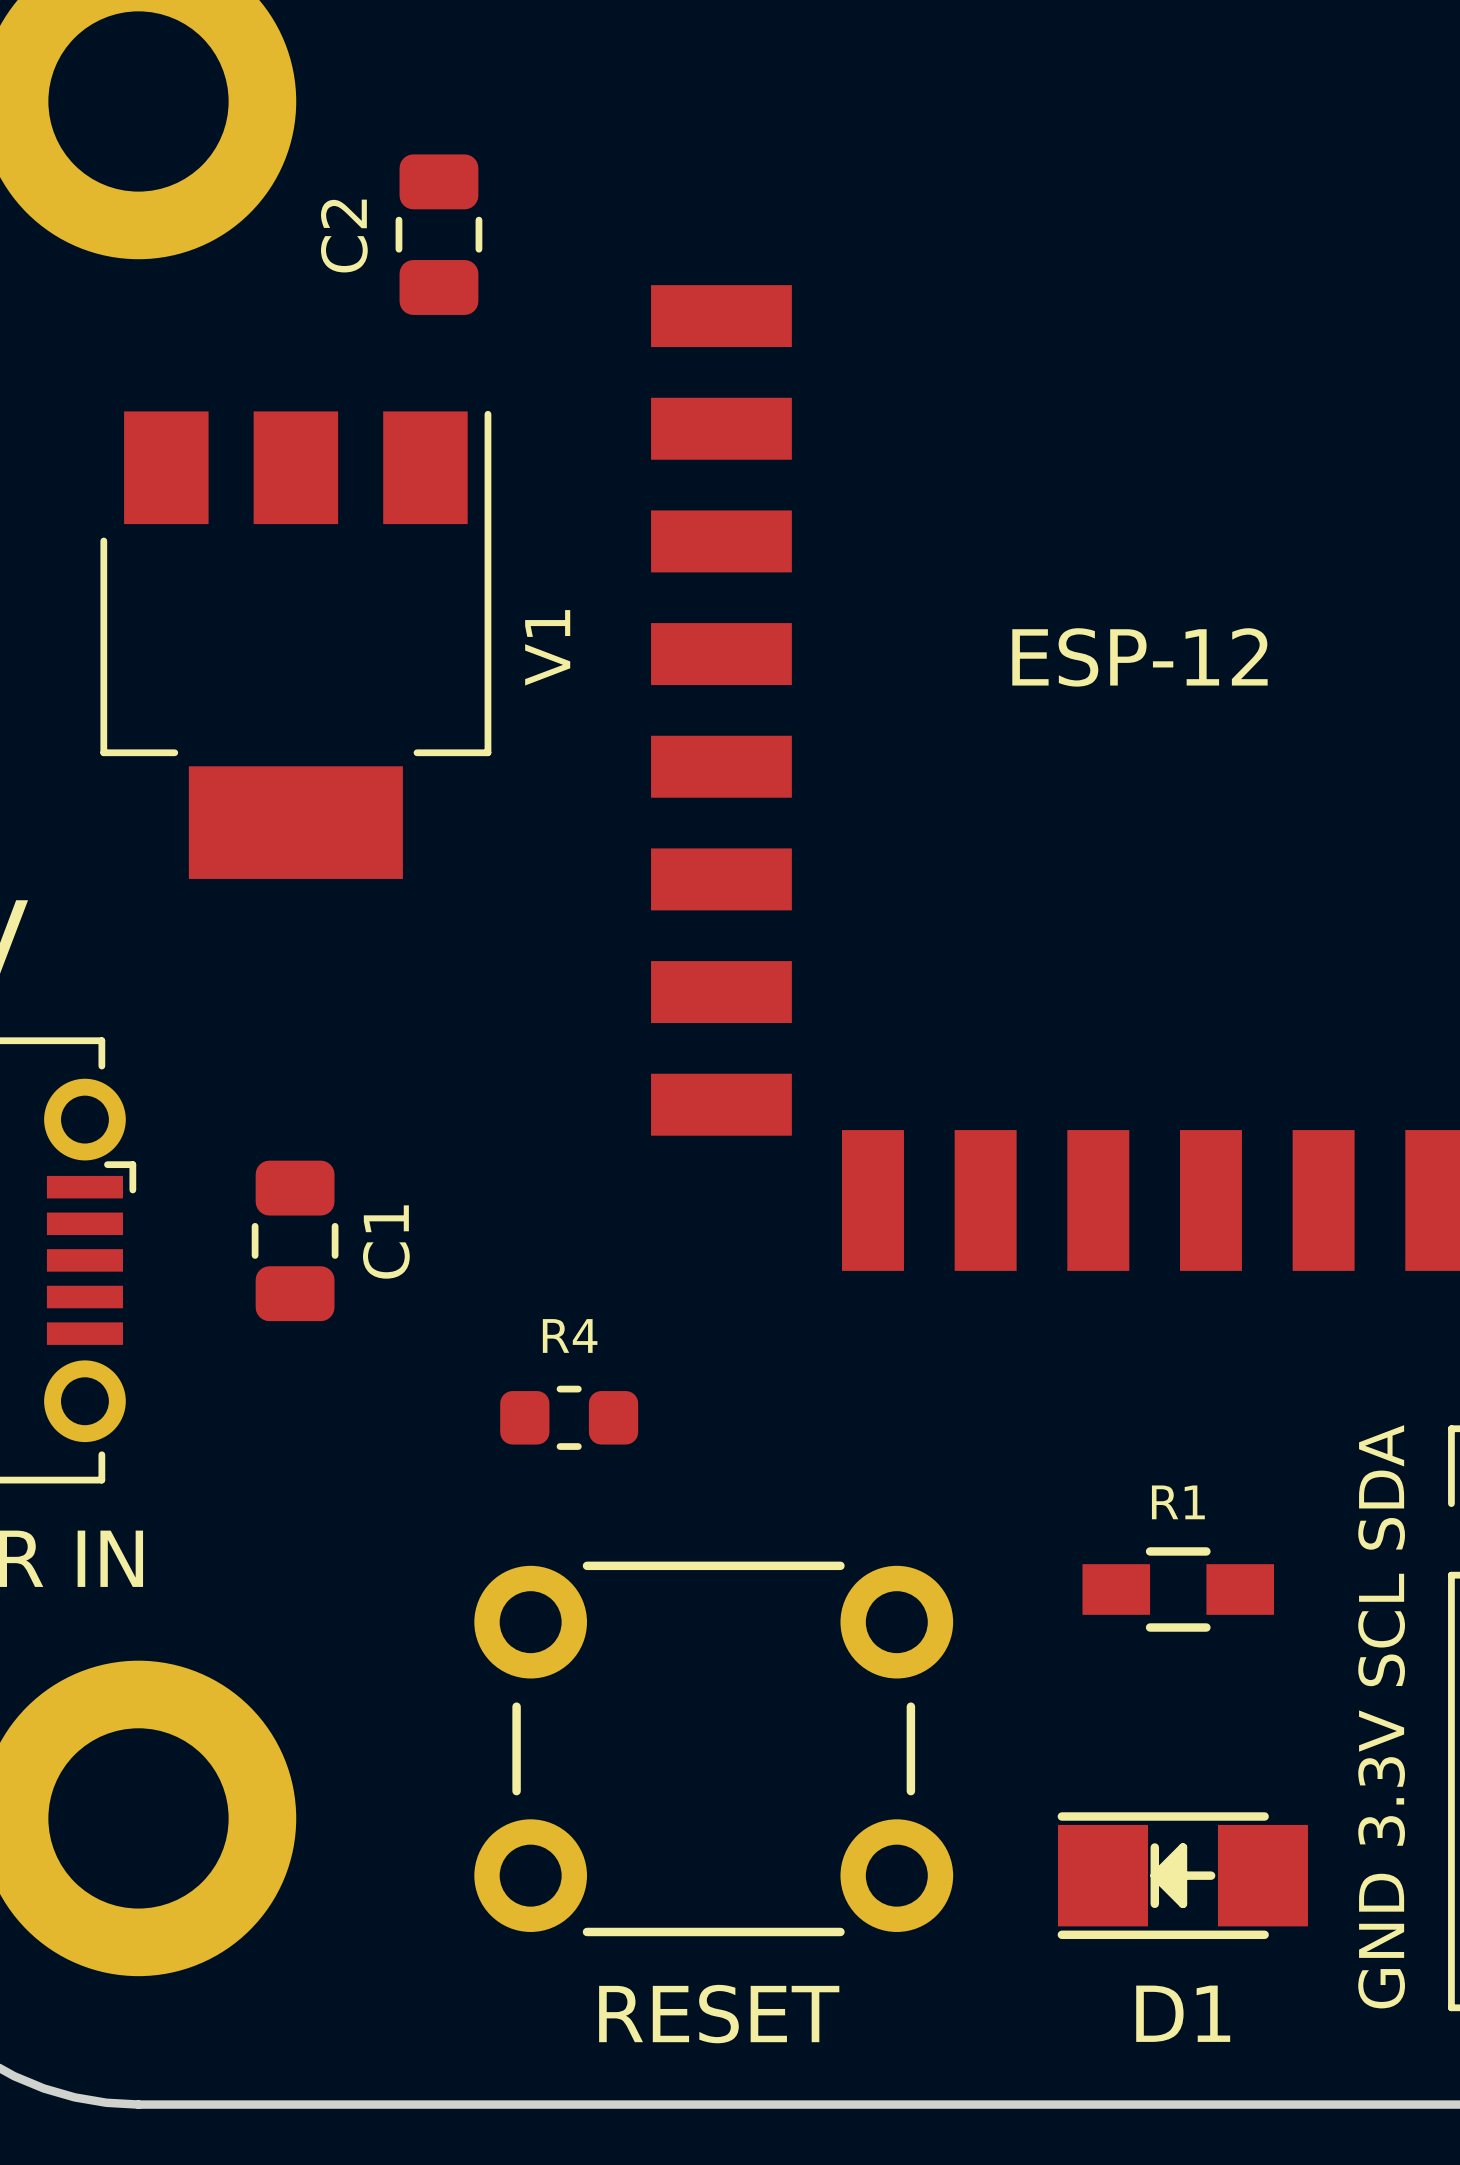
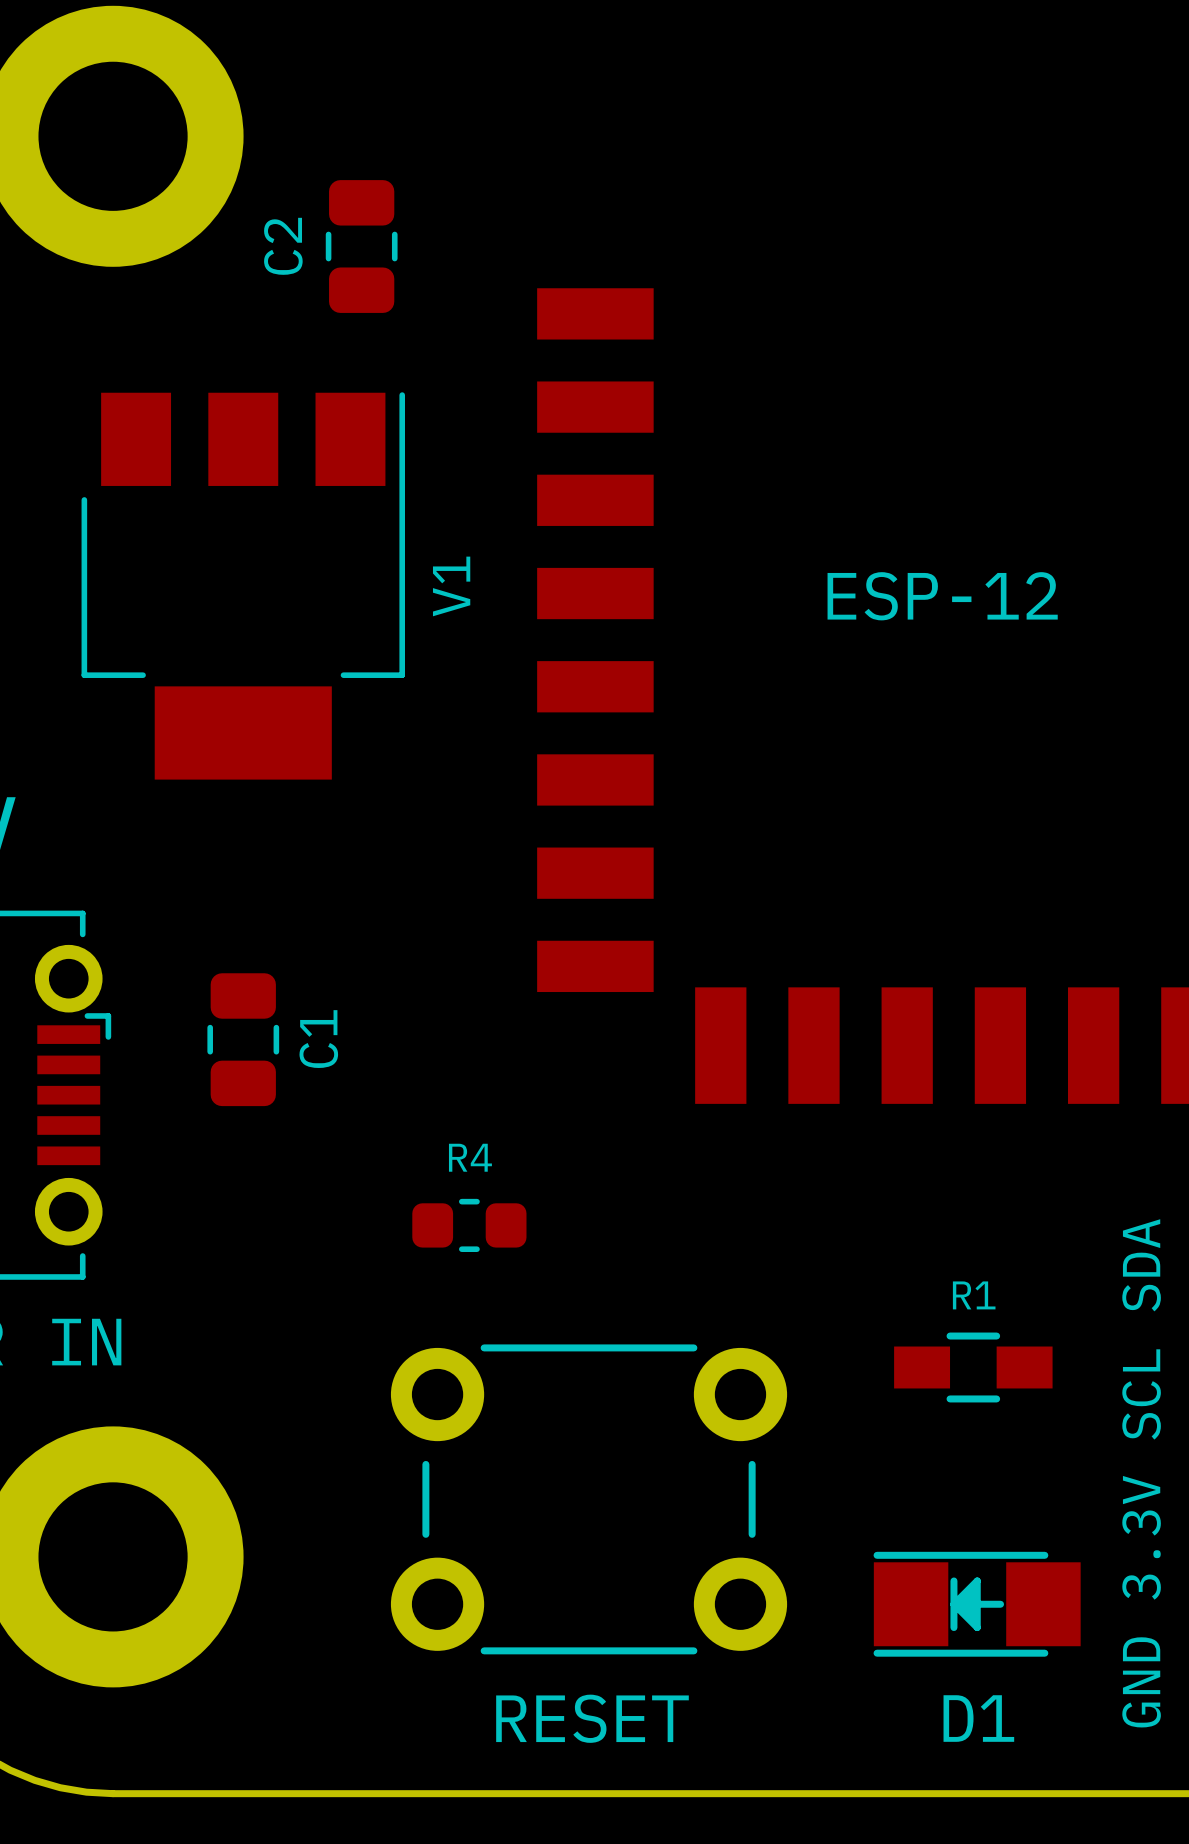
C1 position: (295, 1240) -> (243, 1039)

